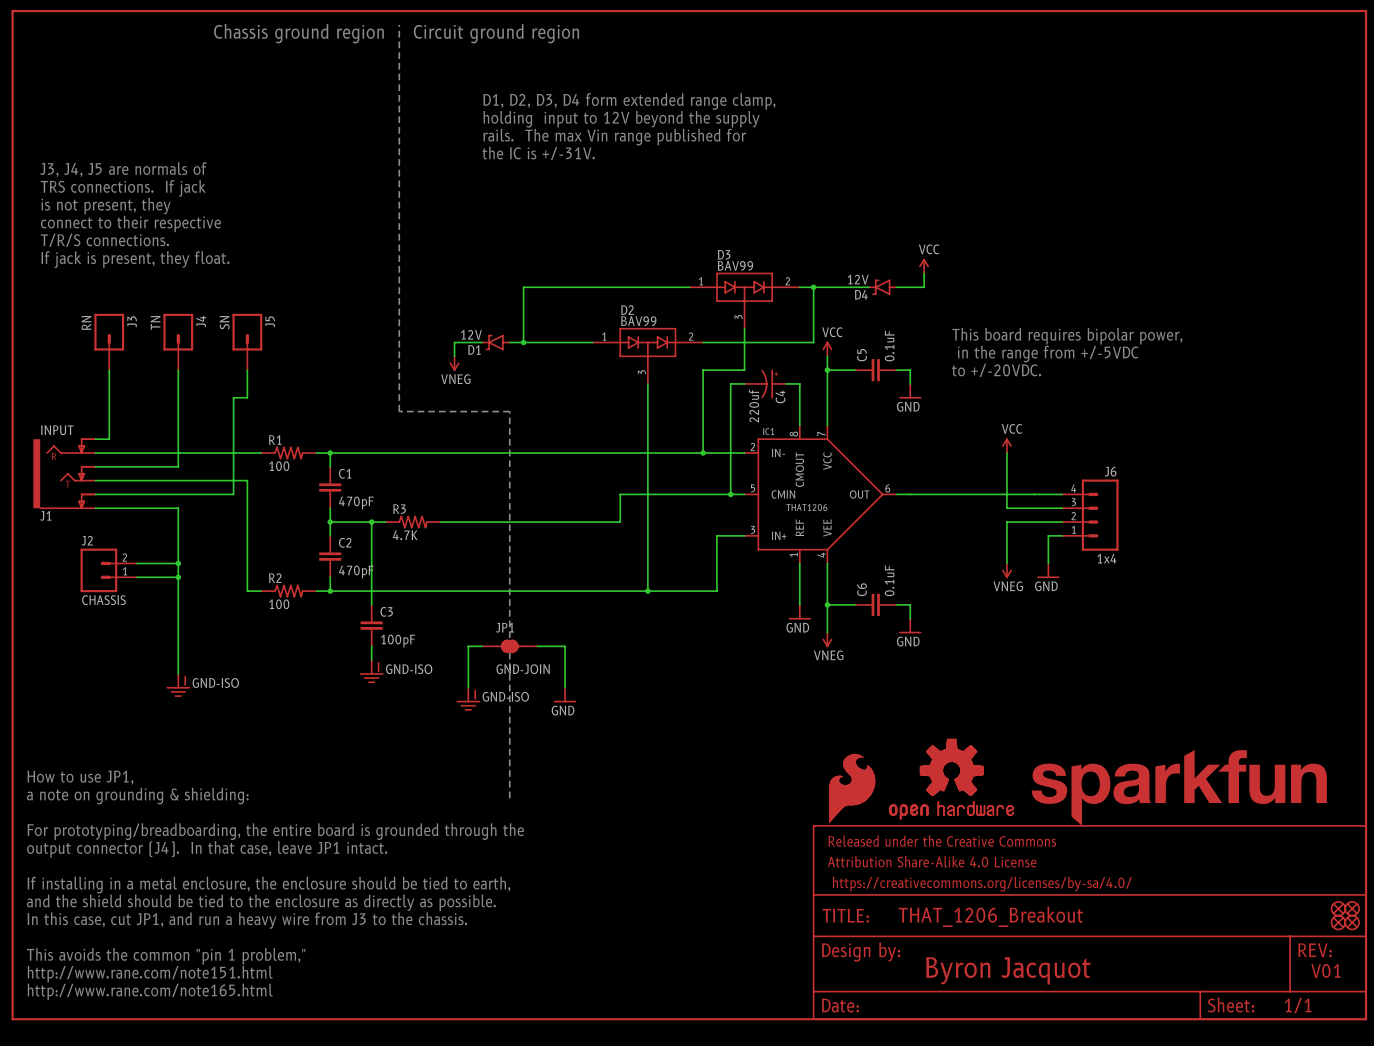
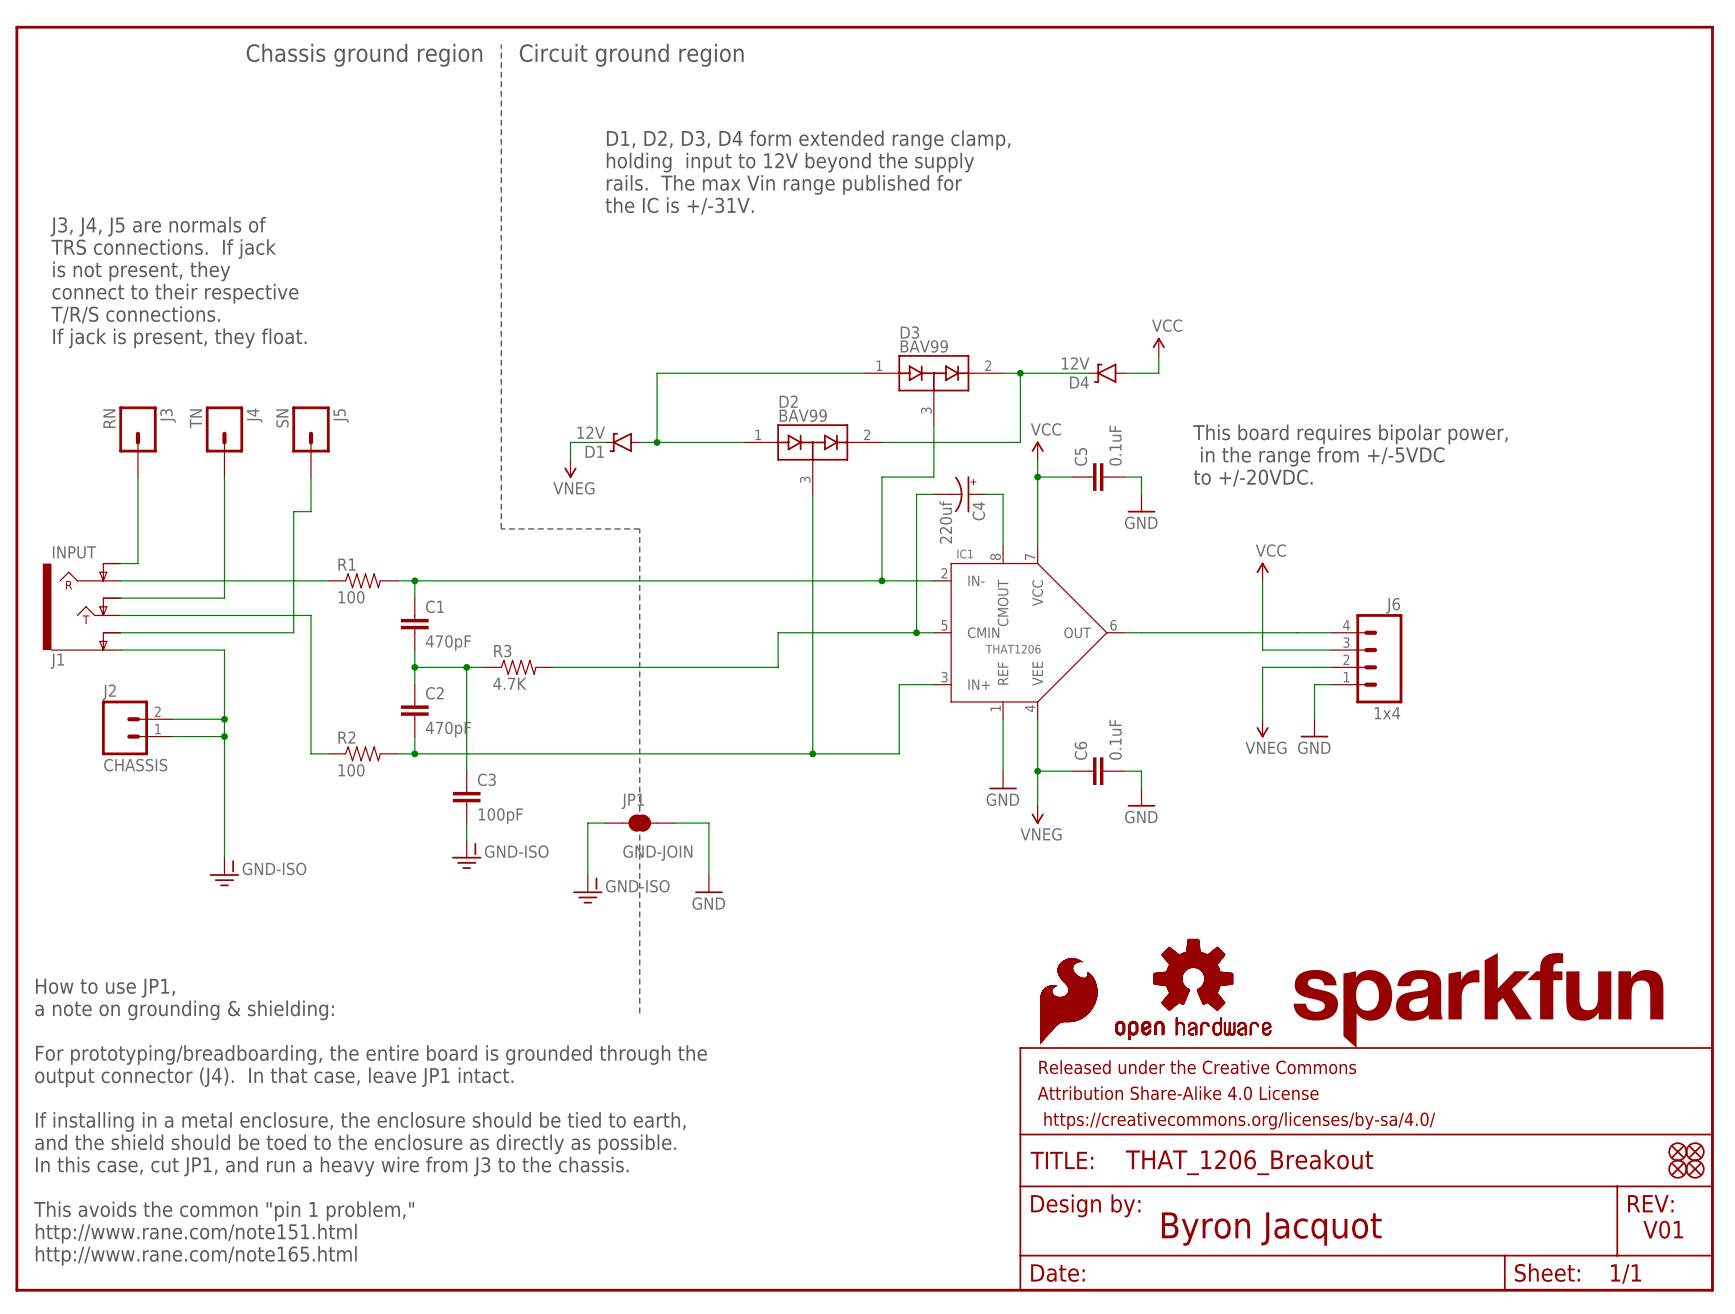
text: and the shield should be tied to the enclosure as directly as possible. (261, 902) -> and the shield should be toed to the enclosure as directly as possible. (355, 1144)

